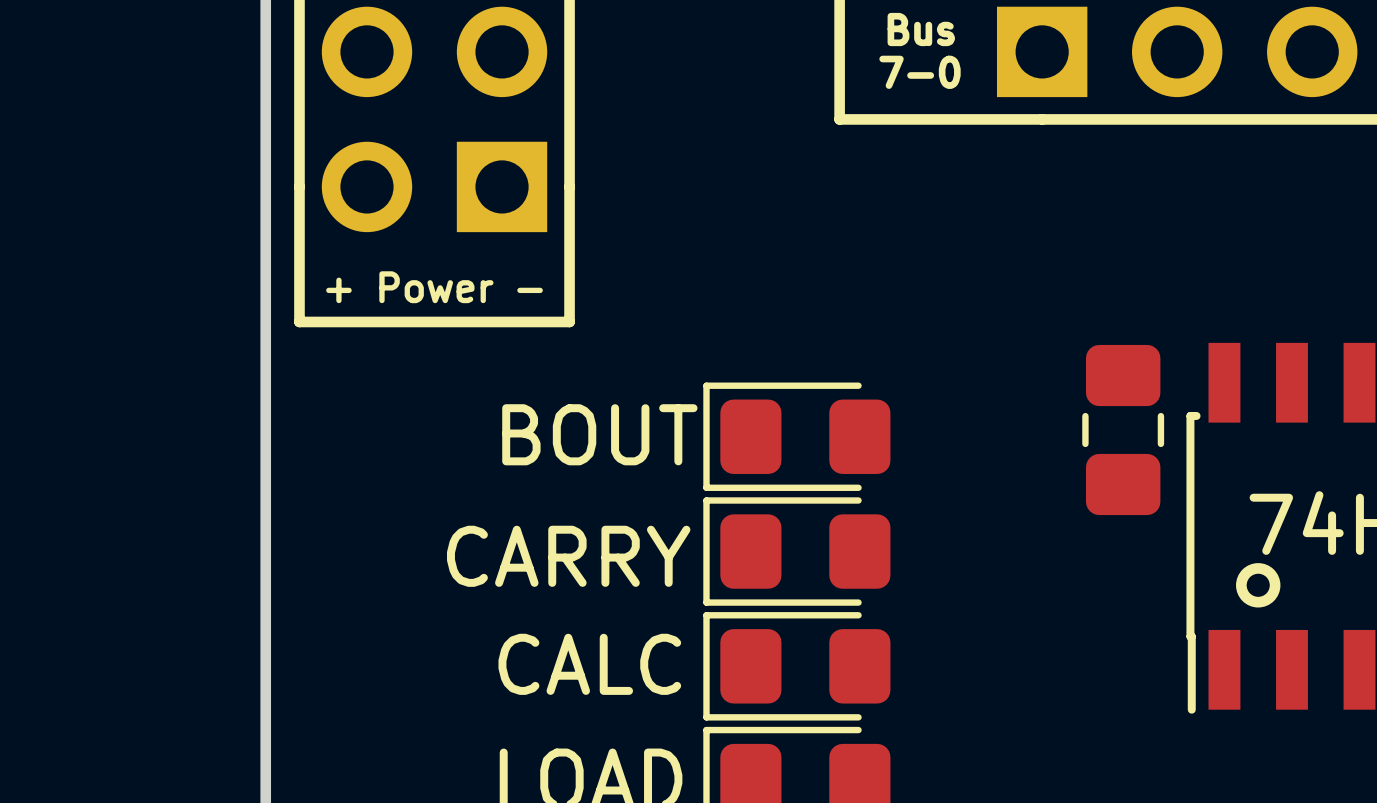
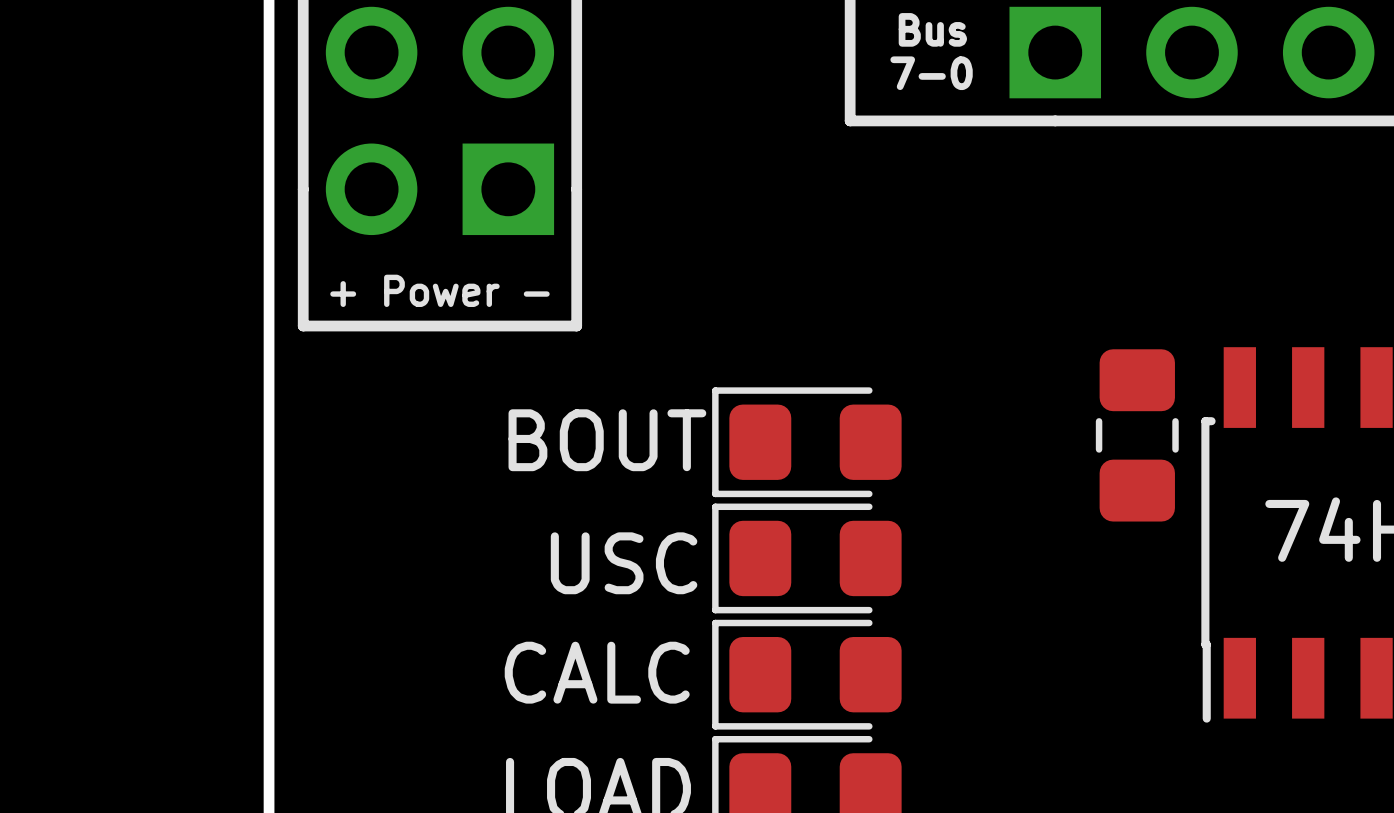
part value: CARRY (568, 556) -> USC (624, 563)
drawing: [1236, 563, 1281, 608] -> none

